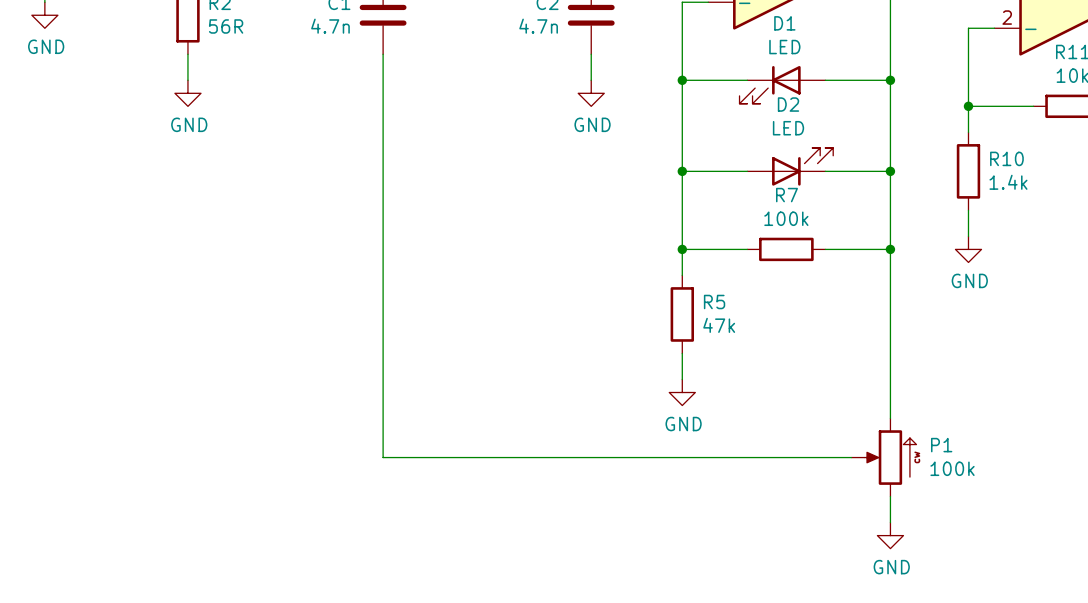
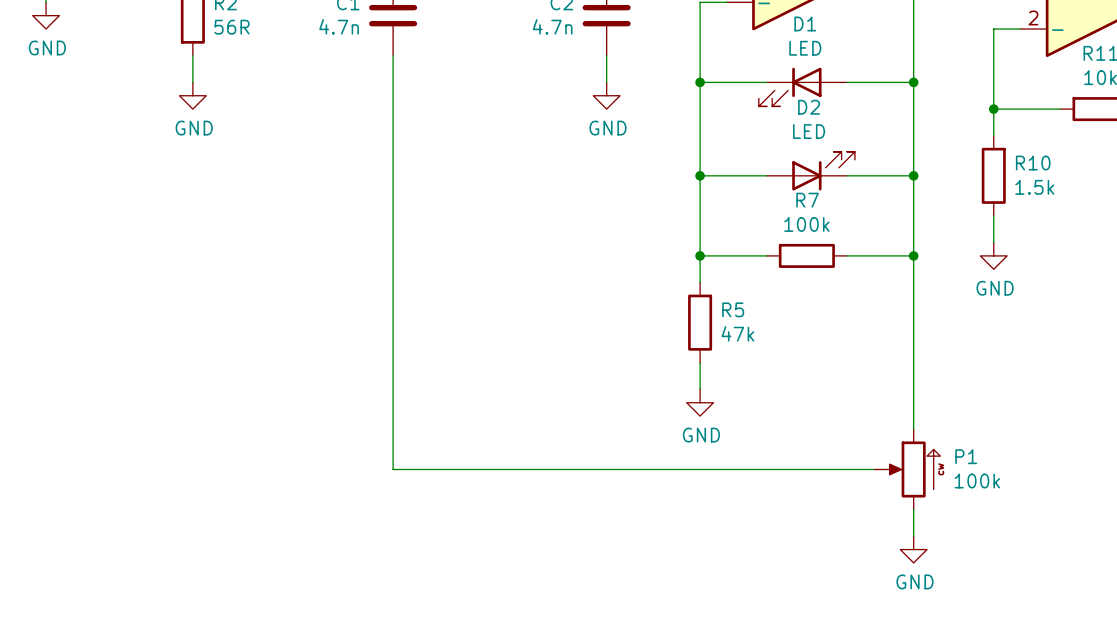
R10 value: 1.4k (1008, 182) -> 1.5k (1034, 187)

